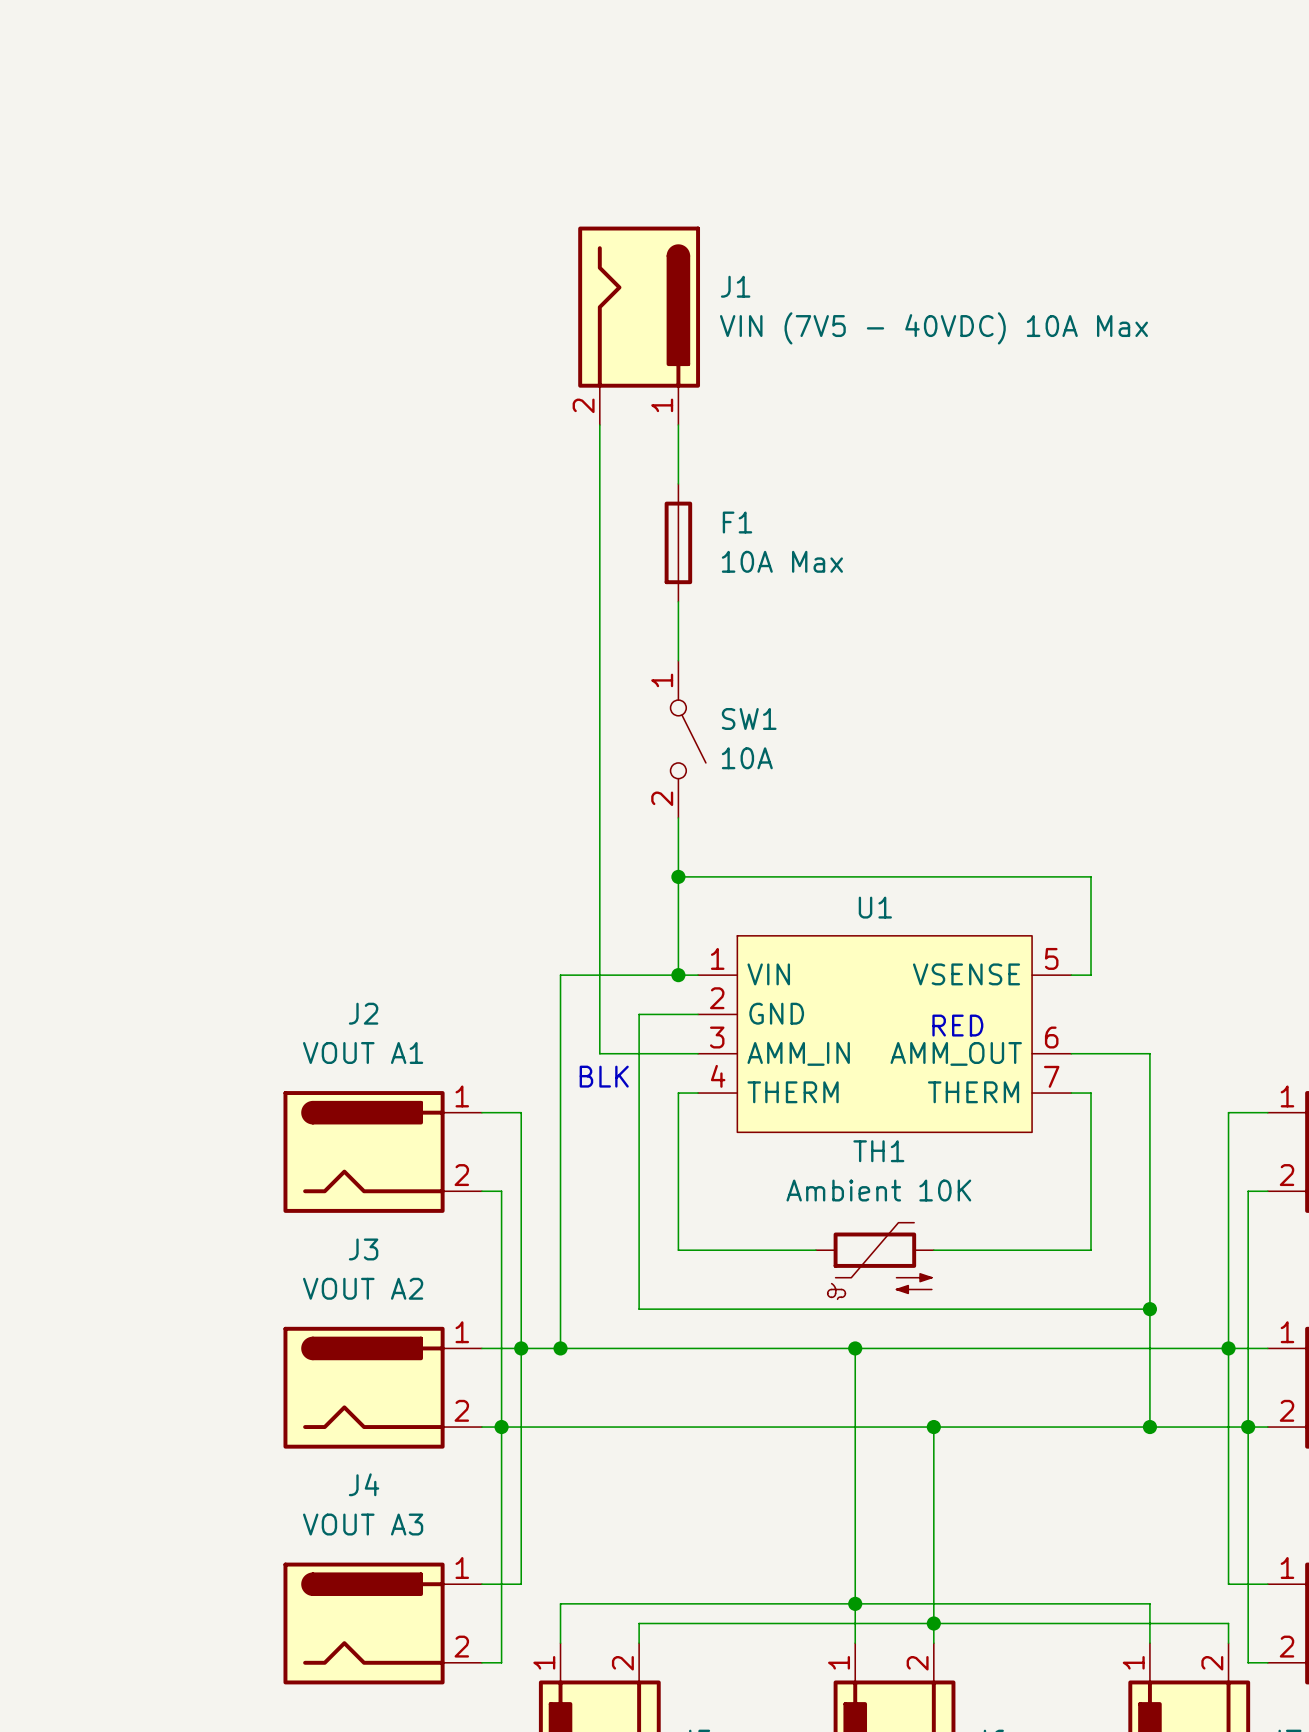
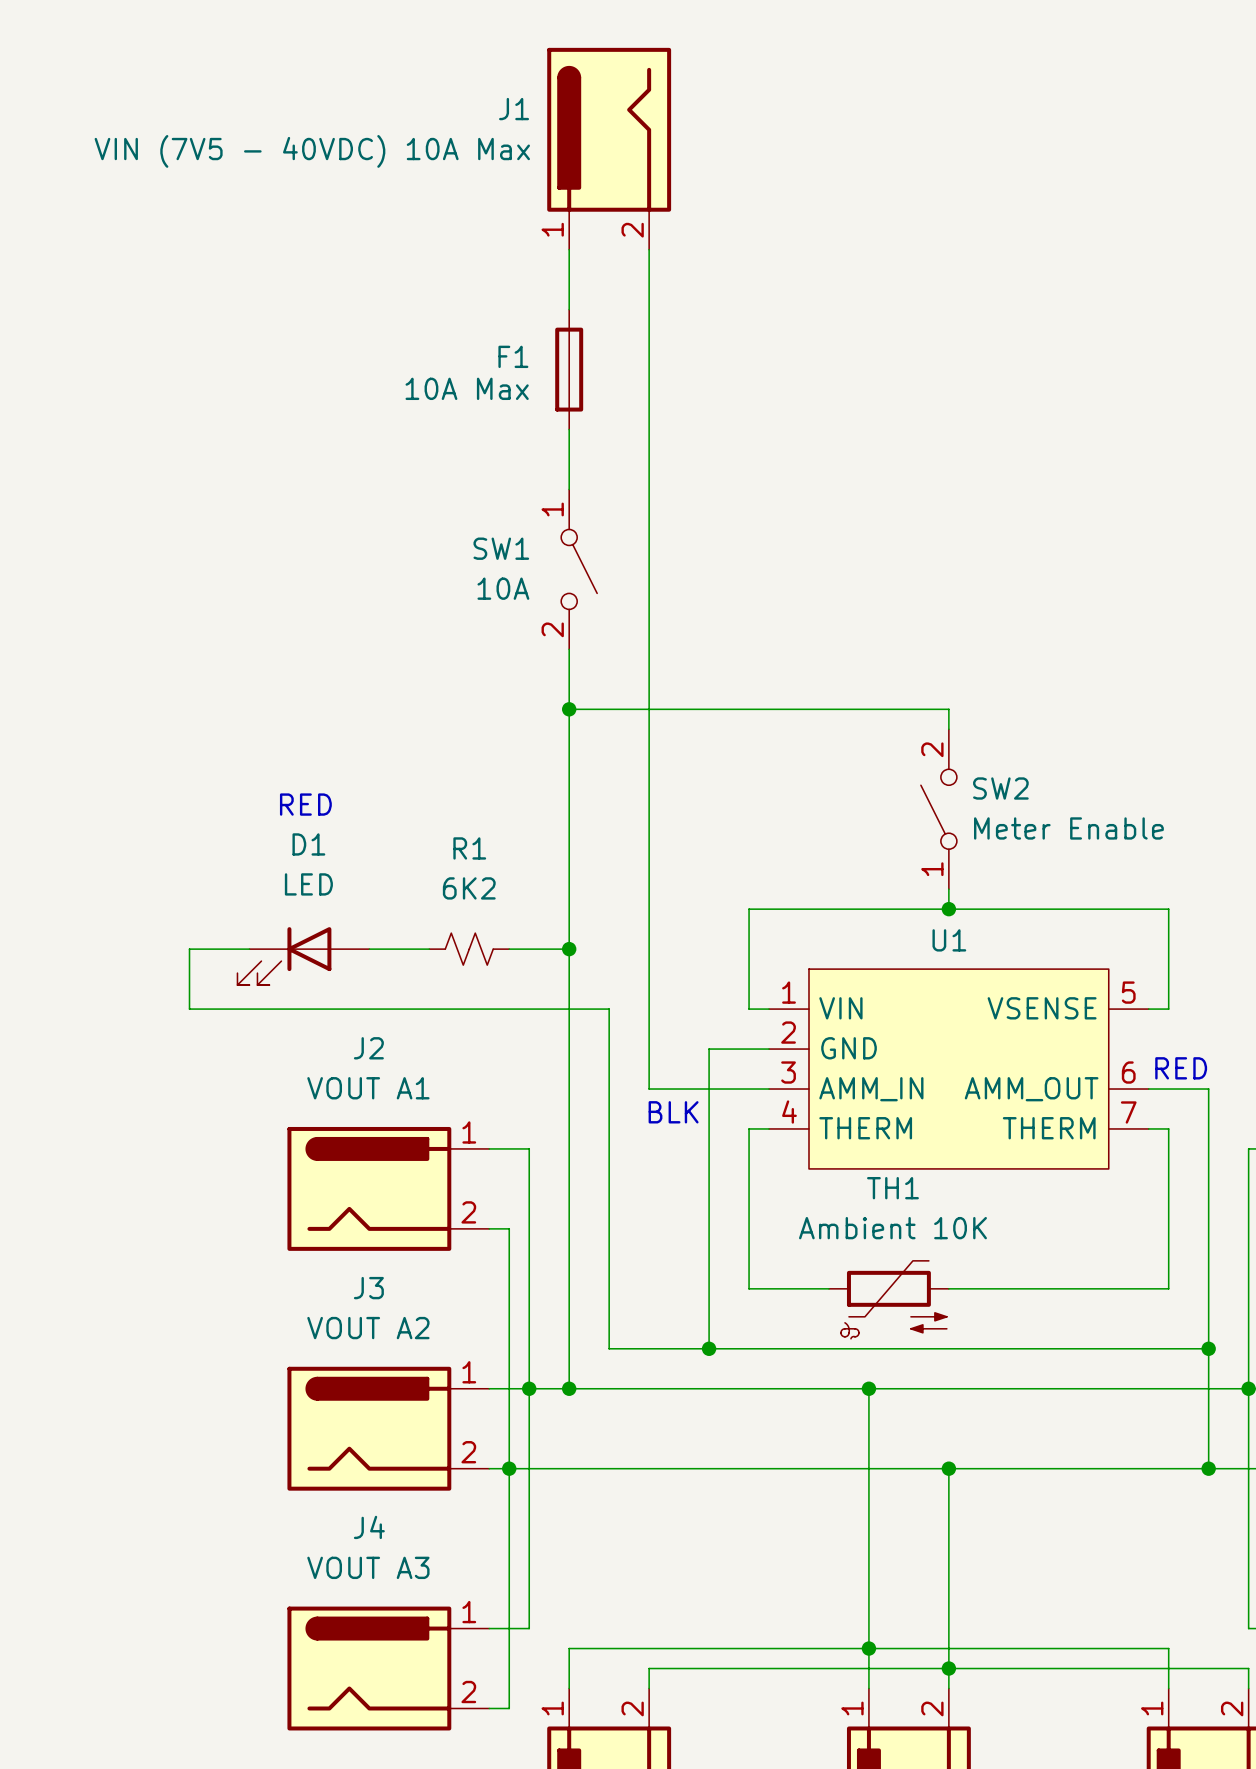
J1 flip: as is (639, 307) -> left-right (609, 129)
J1 position: (639, 325) -> (609, 148)
wire: (599, 425) (599, 975) (698, 975) -> none
wire: (678, 425) (678, 483) -> (569, 249) (569, 309)
F1 name position: F1 (737, 522) -> F1 (513, 356)
F1 position: (678, 542) -> (569, 369)
F1 value position: 10A Max (782, 561) -> 10A Max (467, 388)
wire: (678, 601) (678, 660) -> (569, 429) (569, 489)
wire: none -> (569, 649) (569, 1009) (189, 1009) (189, 949) (249, 949)
wire: none -> (569, 709) (948, 709) (948, 729)
junction: none -> (569, 709)
SW1 name position: SW1 (749, 718) -> SW1 (501, 548)
SW1 position: (688, 739) -> (579, 569)
SW1 value position: 10A (747, 758) -> 10A (503, 588)
text: none -> RED (305, 804)
SW2: none -> Meter Enable (938, 809)
wire: (678, 817) (678, 975) -> none
wire: none -> (948, 889) (948, 909)
wire: (678, 876) (737, 876) -> (769, 1009) (749, 1009) (749, 909)
junction: (678, 876) -> none
junction: none -> (948, 909)
wire: (1091, 876) (1091, 975) (1071, 975) -> (1108, 909) (1168, 909) (1168, 1009) (1148, 1009)
wire: none -> (369, 949) (429, 949)
R1: none -> 6K2 (469, 949)
wire: none -> (509, 949) (569, 949)
junction: none -> (569, 949)
D1: none -> LED (303, 956)
junction: (678, 975) -> none
wire: (639, 1014) (698, 1014) -> (649, 1049) (649, 249)
wire: none -> (769, 1049) (709, 1049) (709, 1348)
text position: RED (957, 1025) -> RED (1181, 1068)
U1 position: (884, 1034) -> (958, 1069)
wire: (599, 1053) (639, 1053) (639, 1309) -> (609, 1089) (609, 1348) (649, 1348)
wire: (1149, 1053) (1149, 1093) -> (1148, 1128) (1168, 1128)
wire: none -> (1168, 1089) (1208, 1089) (1208, 1468)
text position: BLK (604, 1076) -> BLK (673, 1112)
wire: (698, 1093) (678, 1093) (678, 1250) (737, 1250) -> (769, 1128) (749, 1128) (749, 1288)
wire: (1071, 1093) (1091, 1093) (1091, 1250) -> (1168, 1288) (1108, 1288)
wire: (1149, 1250) (1149, 1427) -> none
junction: none -> (709, 1348)
wire: none -> (1168, 1348) (1208, 1348)
junction position: (1149, 1309) -> (1208, 1348)
junction position: (1149, 1427) -> (1208, 1468)

